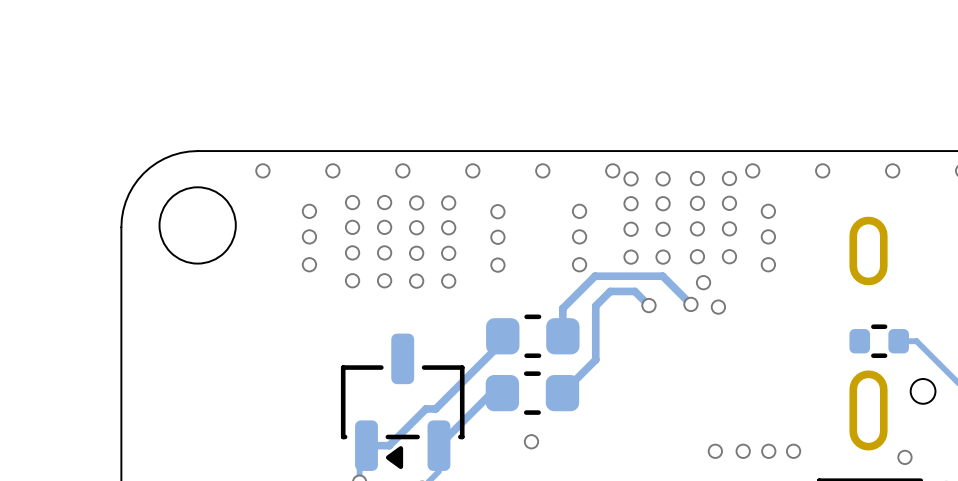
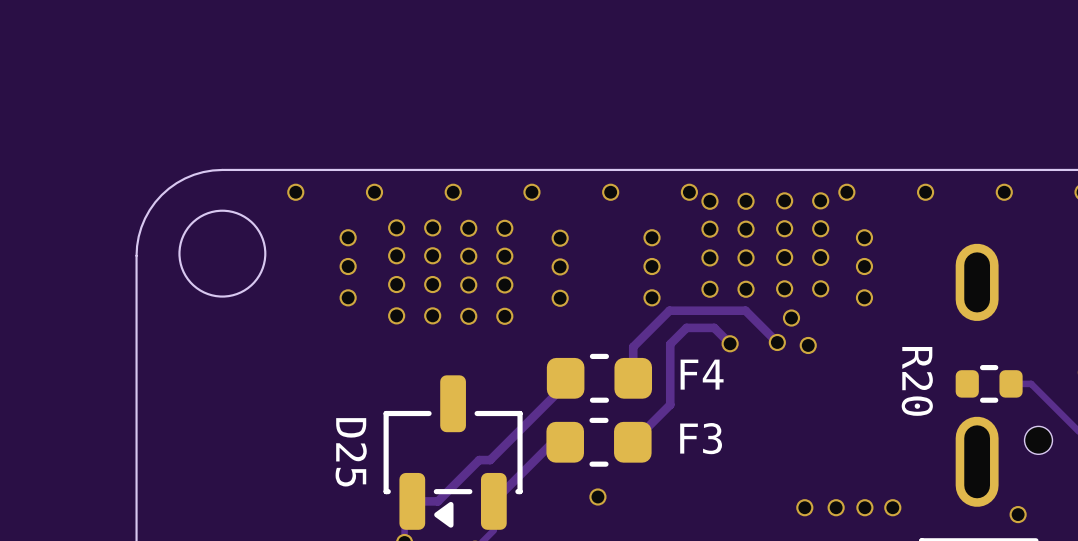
F4 name: none -> F4 (702, 374)
R20 name: none -> R20 (917, 381)
F3 name: none -> F3 (701, 438)
D25 name: none -> D25 (351, 452)

